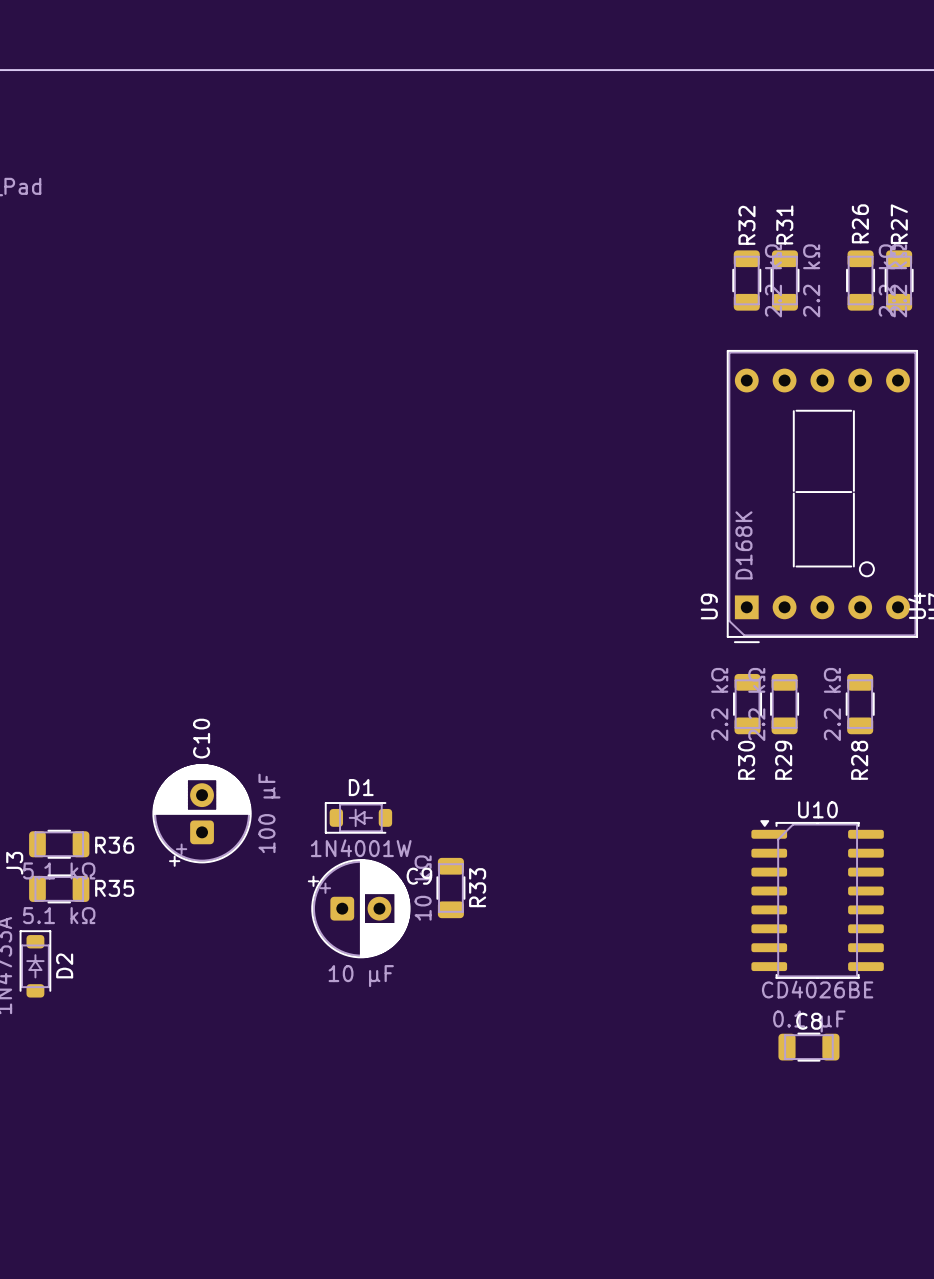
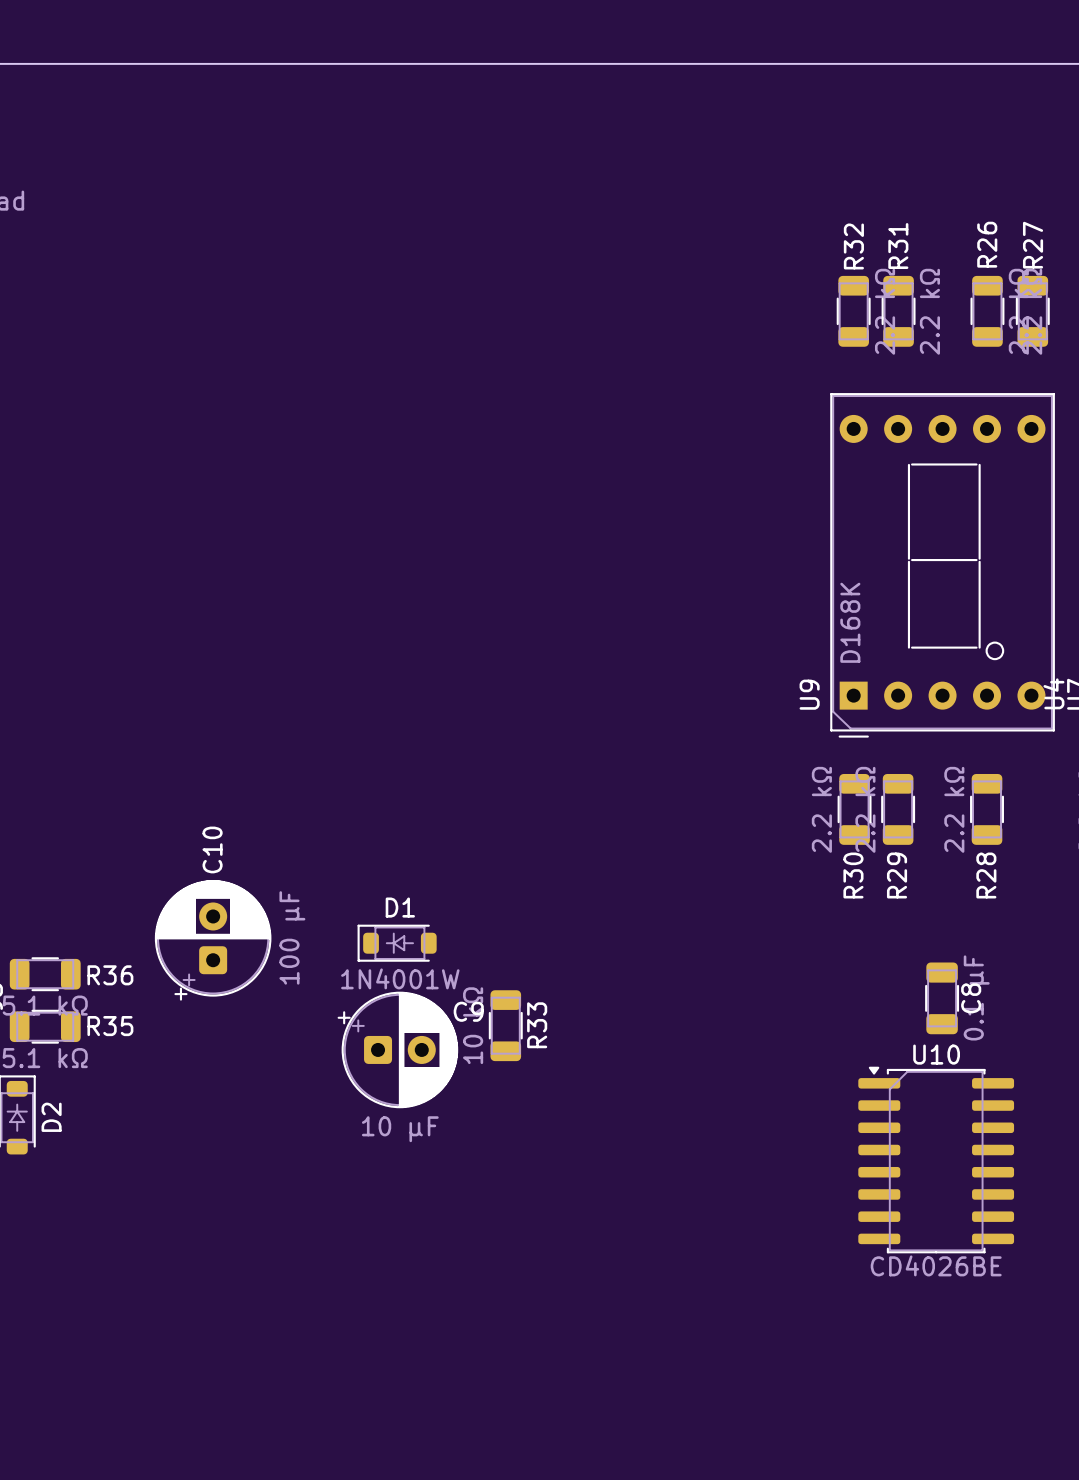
U10 position: (817, 899) -> (936, 1160)
C8 rotation: 0° (808, 1047) -> 90° clockwise (942, 998)
C8 position: (808, 1047) -> (942, 998)

